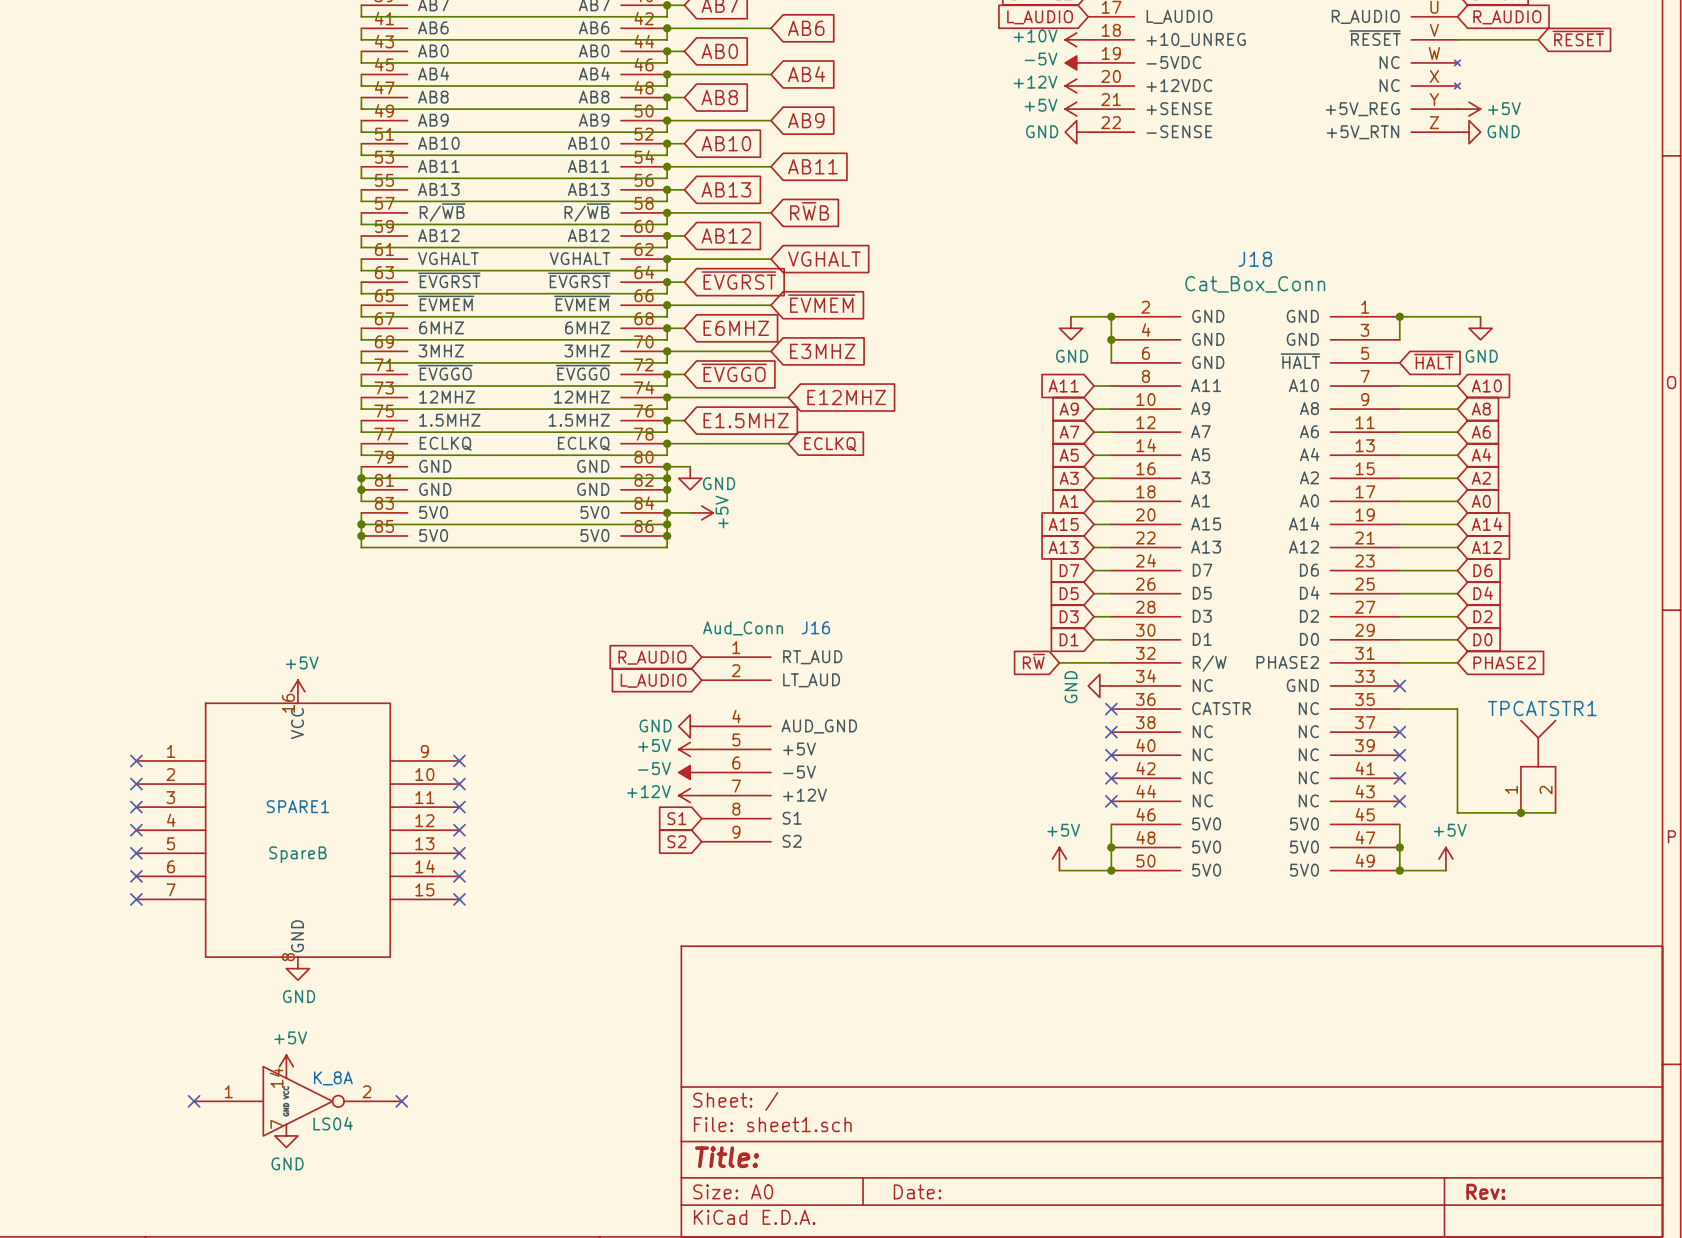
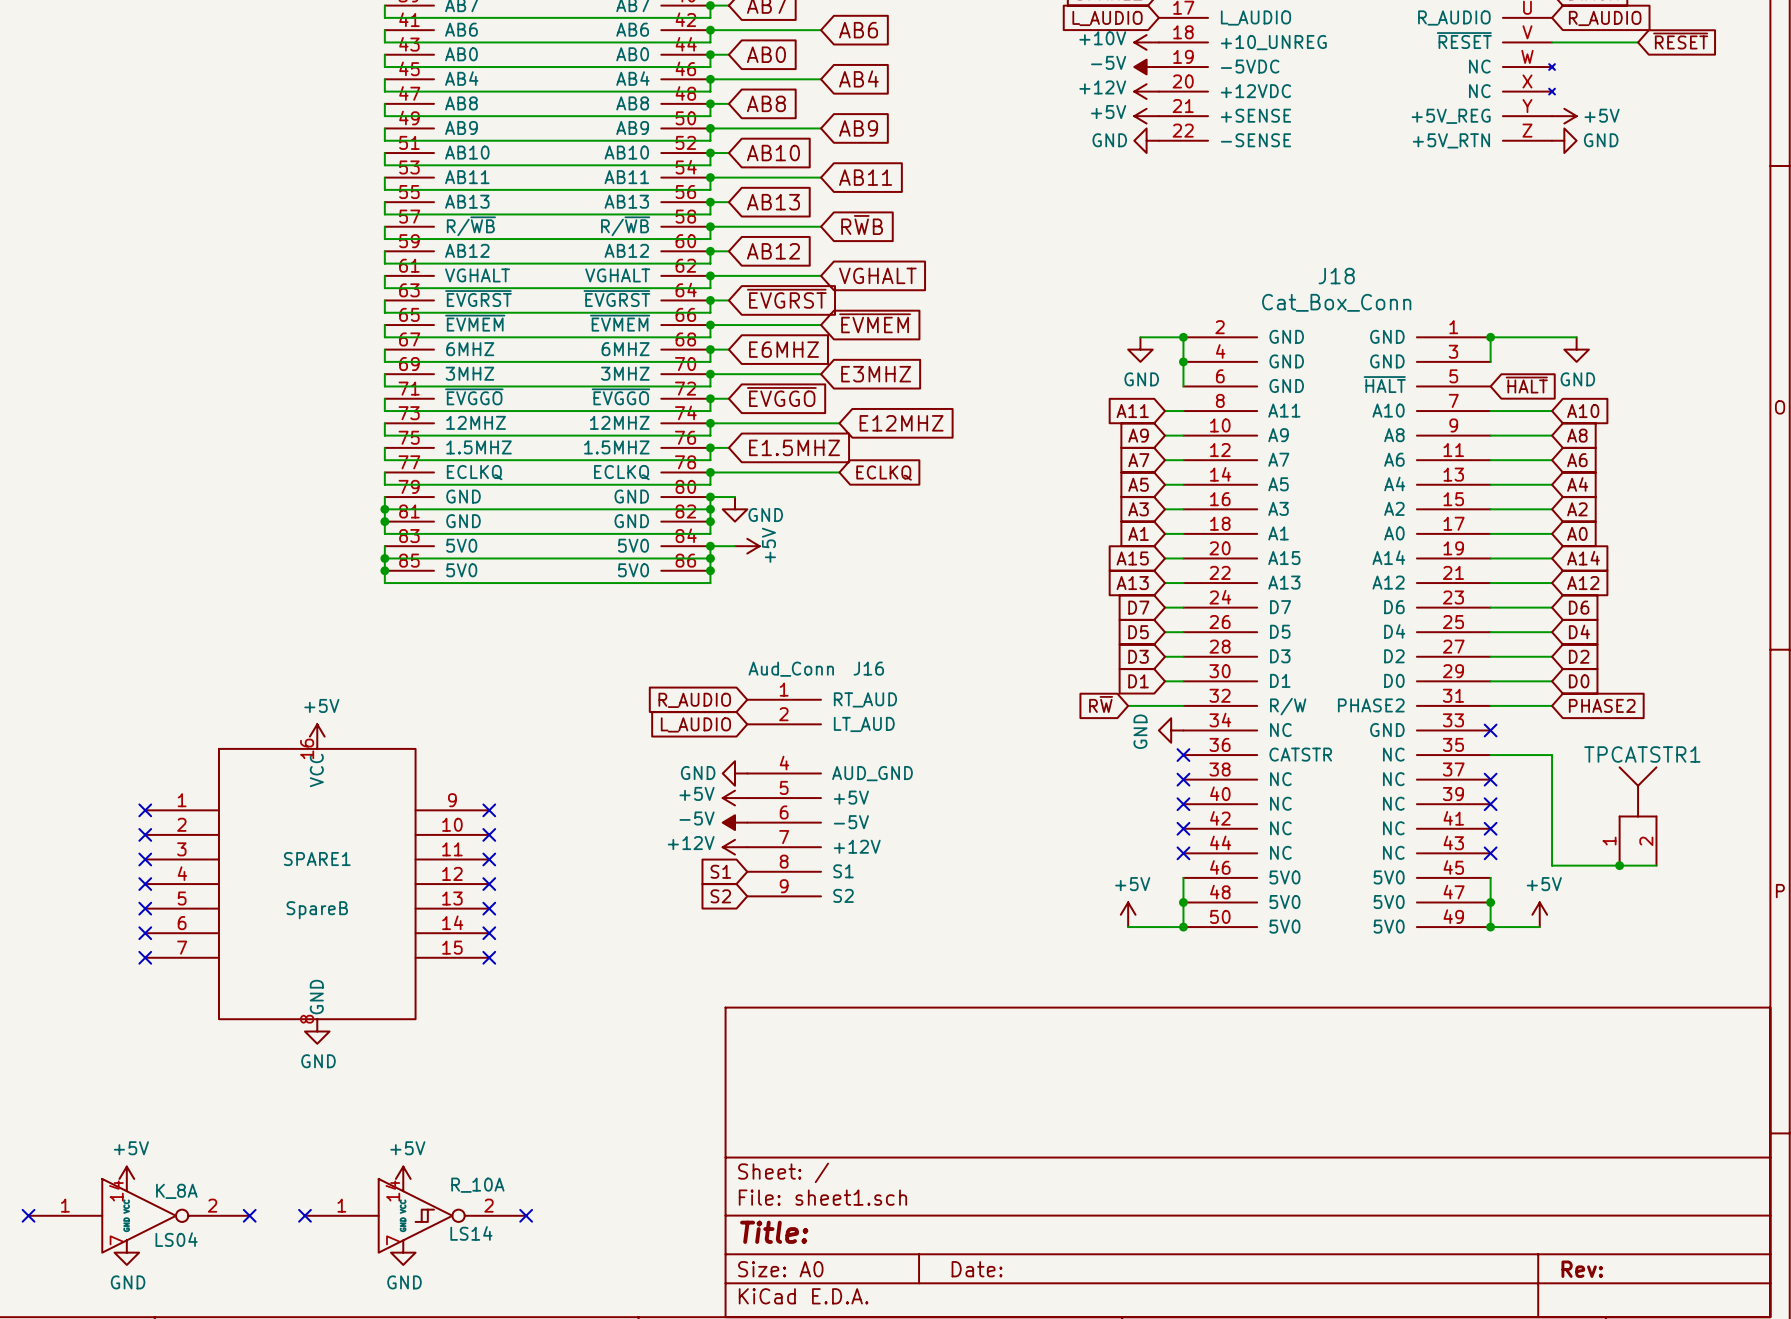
power symbol: +5V (286, 1066) -> none
no-connect mark: (194, 1101) -> none
K_8A position: (297, 1101) -> (139, 1215)
no-connect mark: (401, 1101) -> none
power symbol: none -> +5V (126, 1178)
power symbol: none -> +5V (403, 1178)
power symbol: GND (286, 1135) -> none
no-connect mark: none -> (28, 1215)
no-connect mark: none -> (249, 1215)
no-connect mark: none -> (304, 1215)
R_10A: none -> LS14 (415, 1215)
no-connect mark: none -> (526, 1215)
power symbol: none -> GND (126, 1252)
power symbol: none -> GND (403, 1252)

